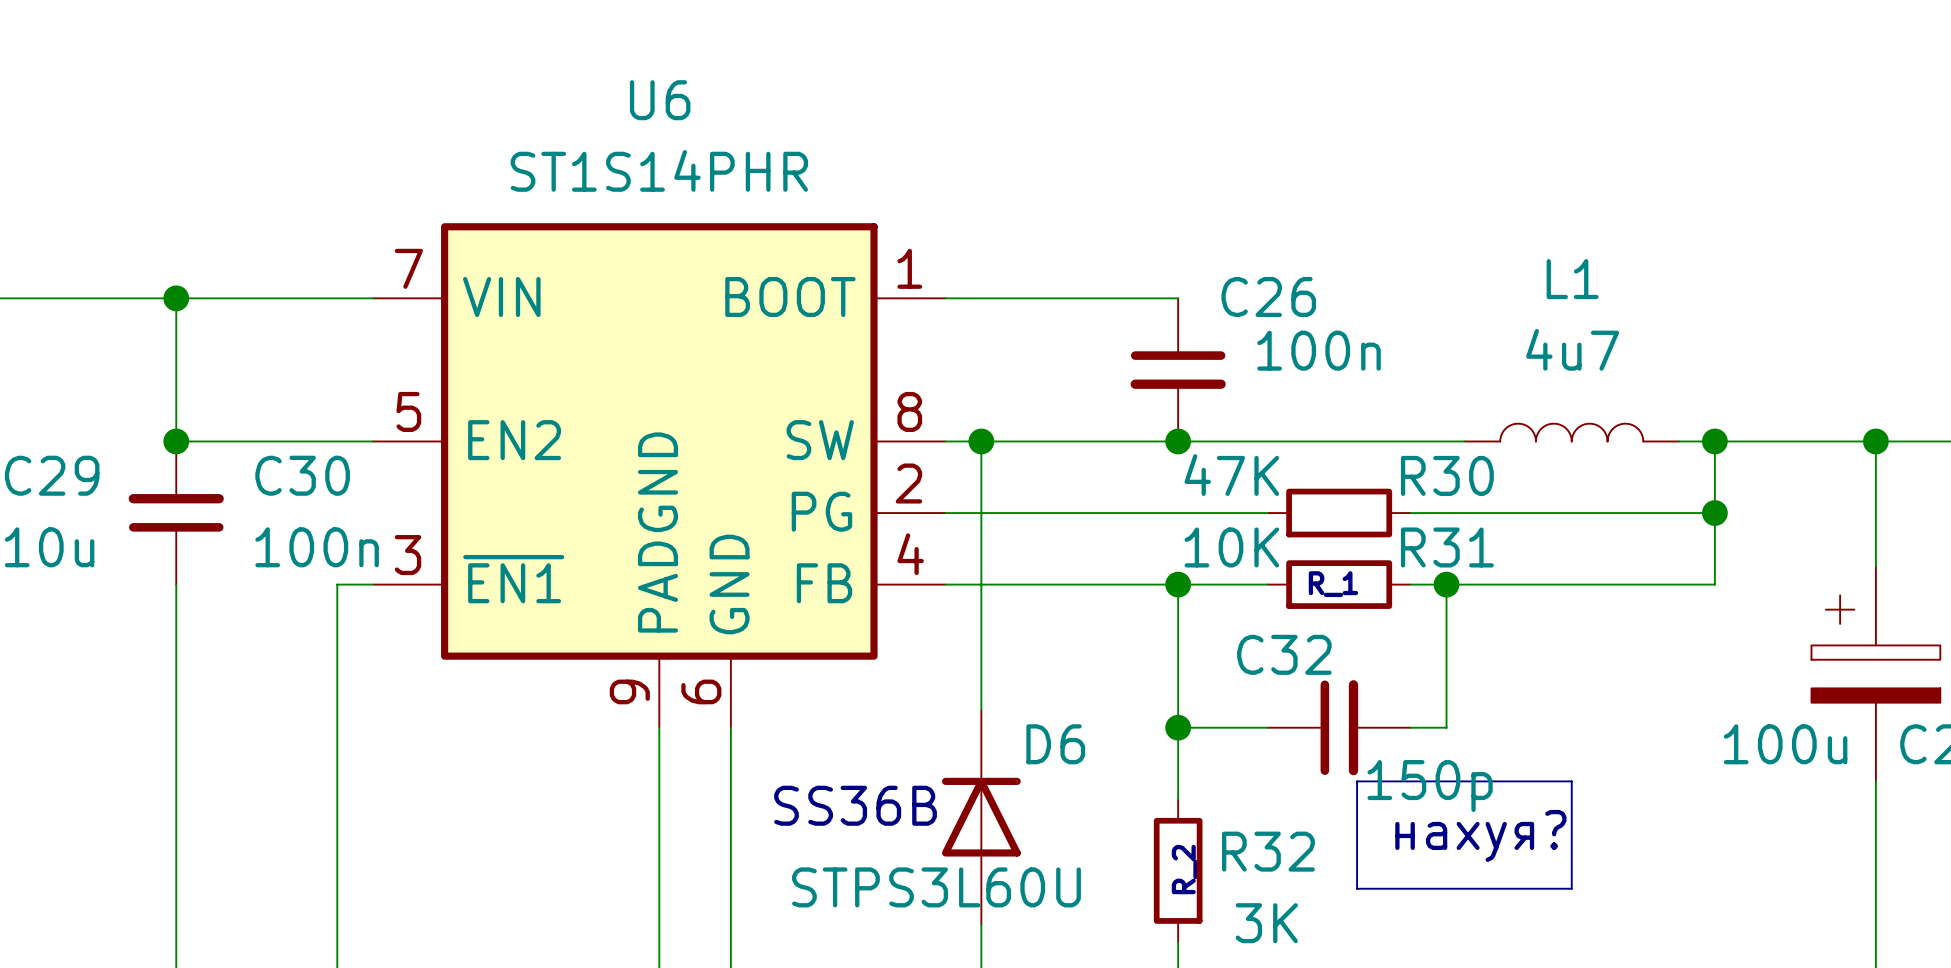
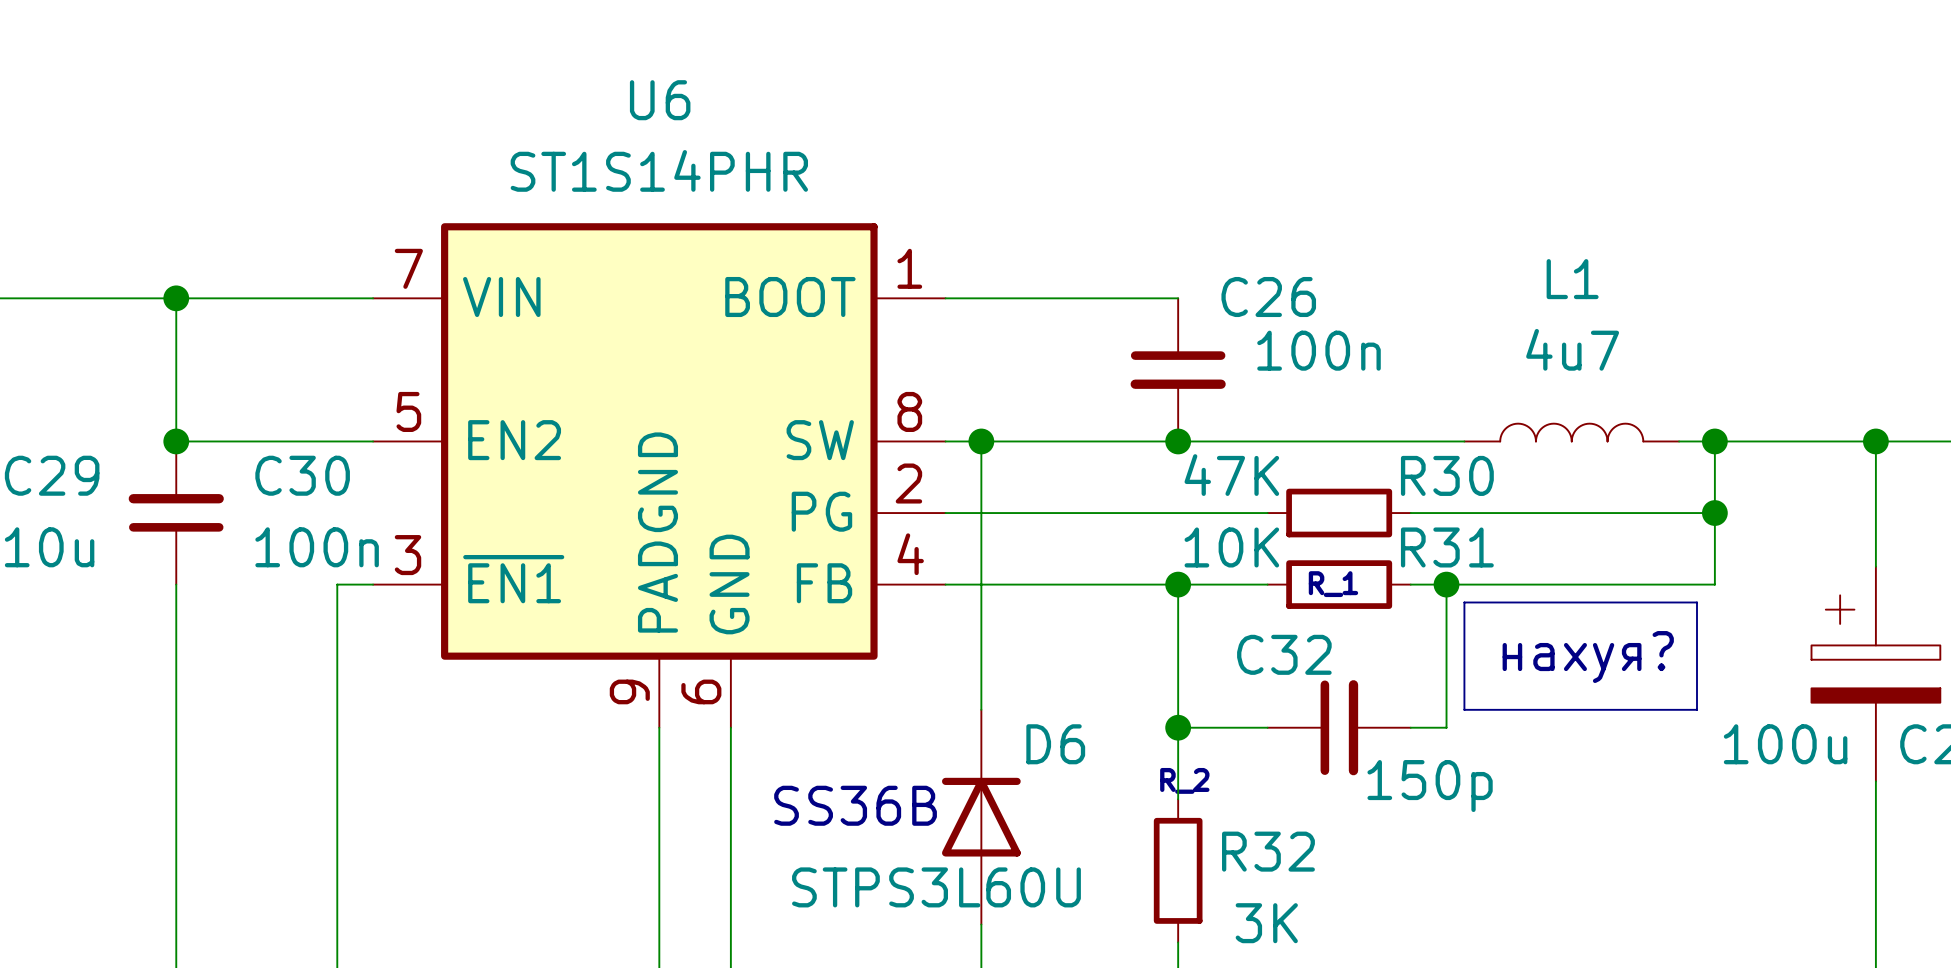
line: none -> (1464, 602) (1697, 602) (1697, 709) (1464, 709) (1464, 602)
line: (1357, 781) (1571, 781) (1571, 888) (1357, 888) (1357, 781) -> none
text position: нахуя? (1480, 835) -> нахуя? (1588, 657)
text rotation: 0° (1184, 869) -> 90° clockwise (1184, 780)
text position: R_2 (1184, 869) -> R_2 (1184, 780)

